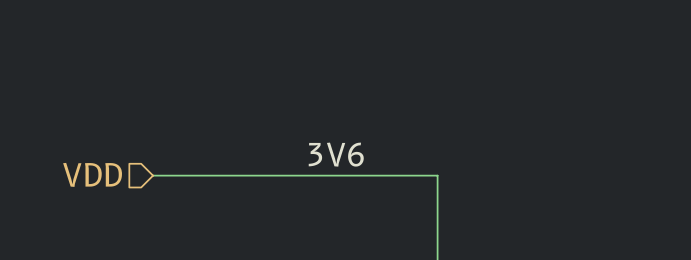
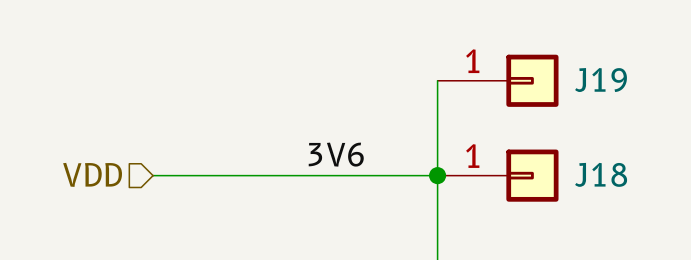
wire: none -> (437, 80) (437, 175)
J19: none -> (498, 80)
junction: none -> (437, 175)
J18: none -> (498, 175)

